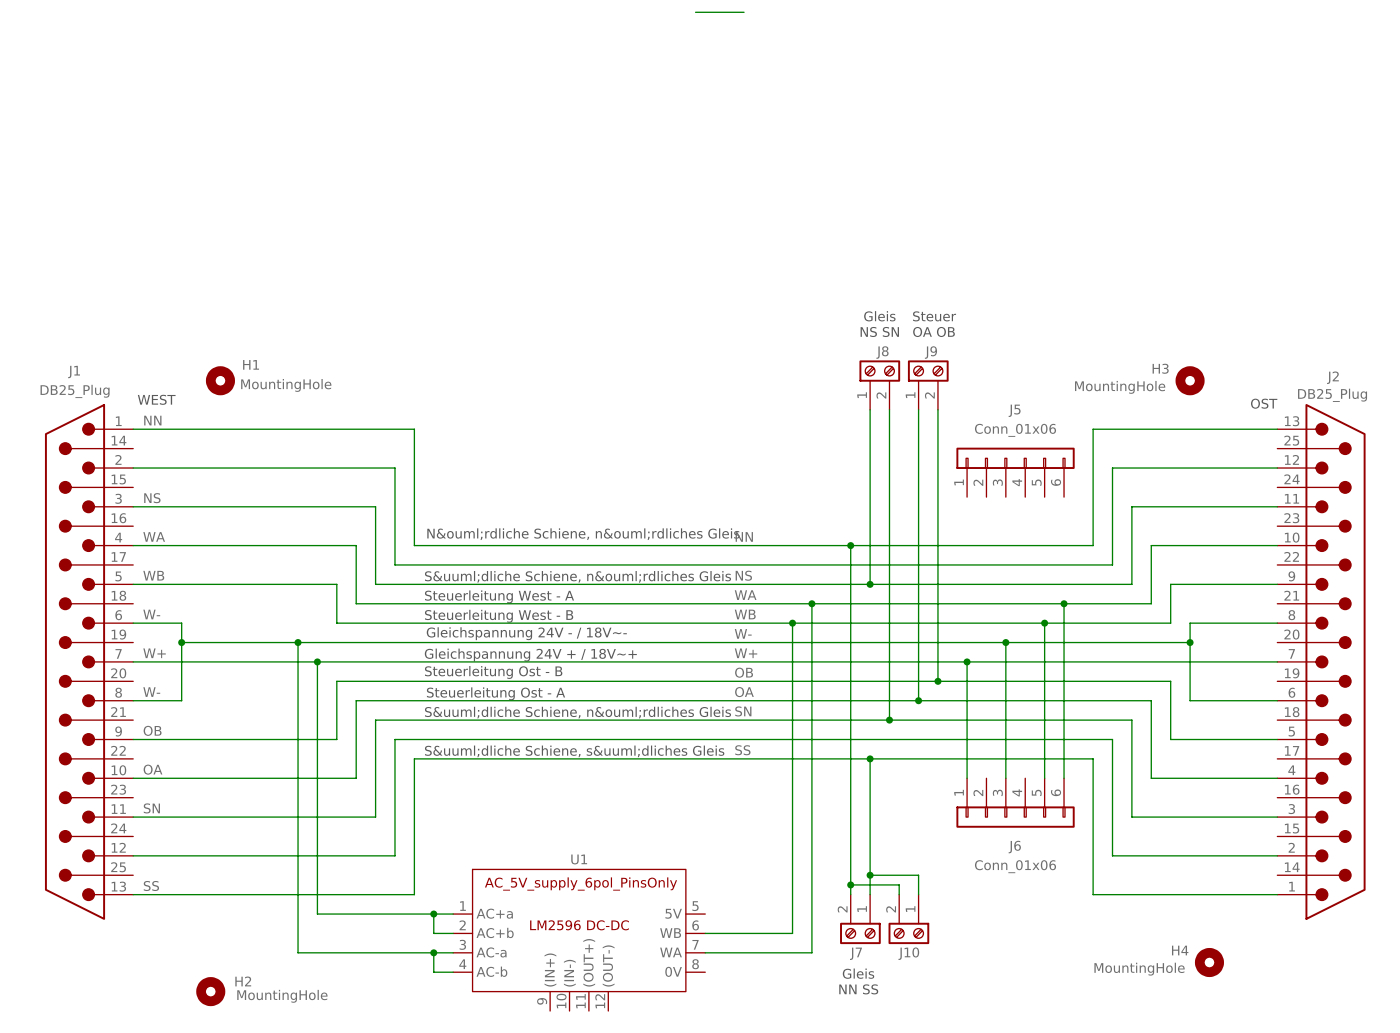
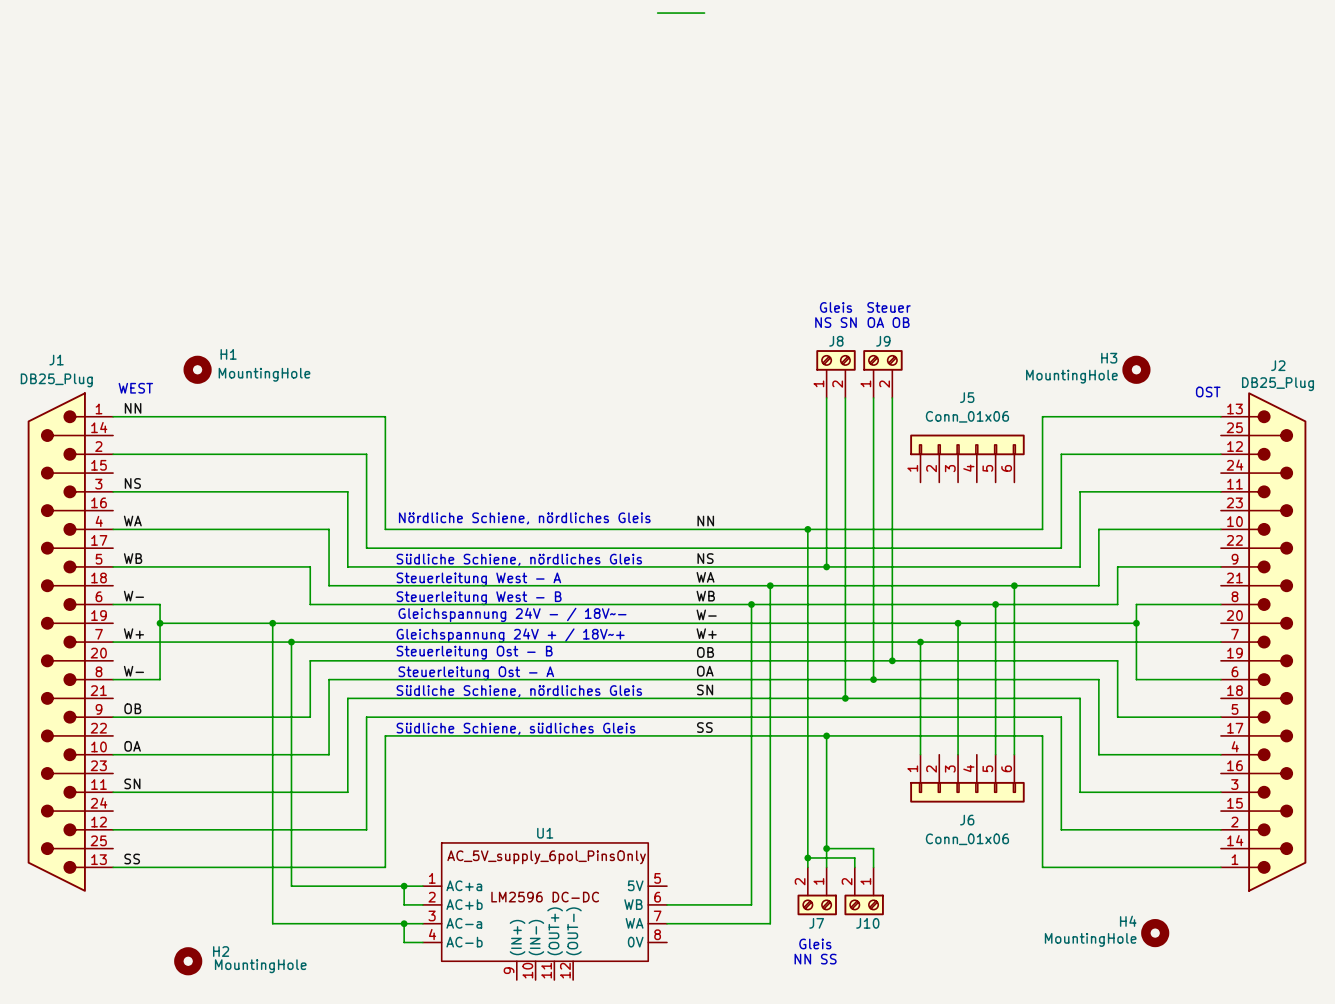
text: N&ouml;rdliche Schiene, n&ouml;rdliches Gleis (583, 534) -> Nördliche Schiene, nördliches Gleis (524, 518)
text: S&uuml;dliche Schiene, n&ouml;rdliches Gleis (577, 576) -> Südliche Schiene, nördliches Gleis (519, 559)
text: S&uuml;dliche Schiene, n&ouml;rdliches Gleis (577, 712) -> Südliche Schiene, nördliches Gleis (519, 691)
text: S&uuml;dliche Schiene, s&uuml;dliches Gleis (574, 751) -> Südliche Schiene, südliches Gleis (515, 728)

